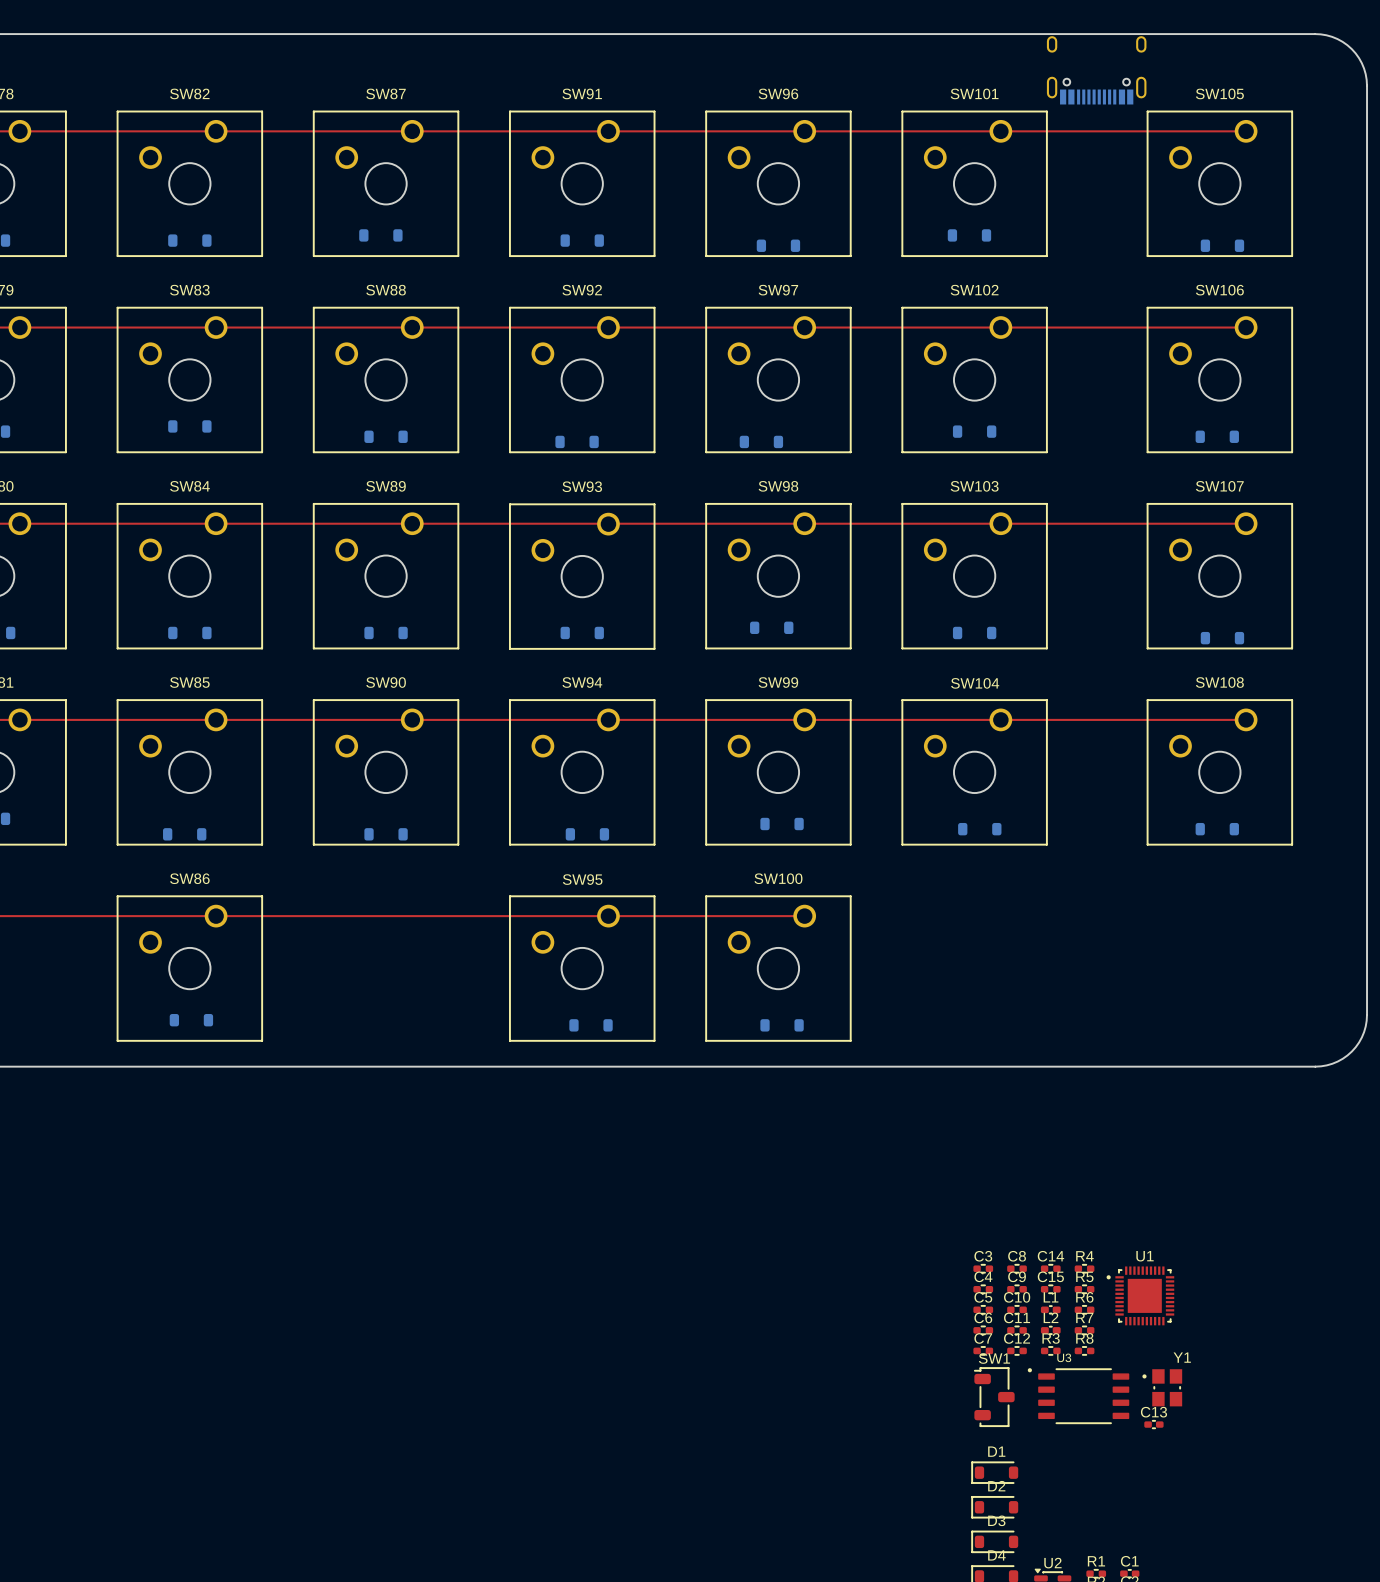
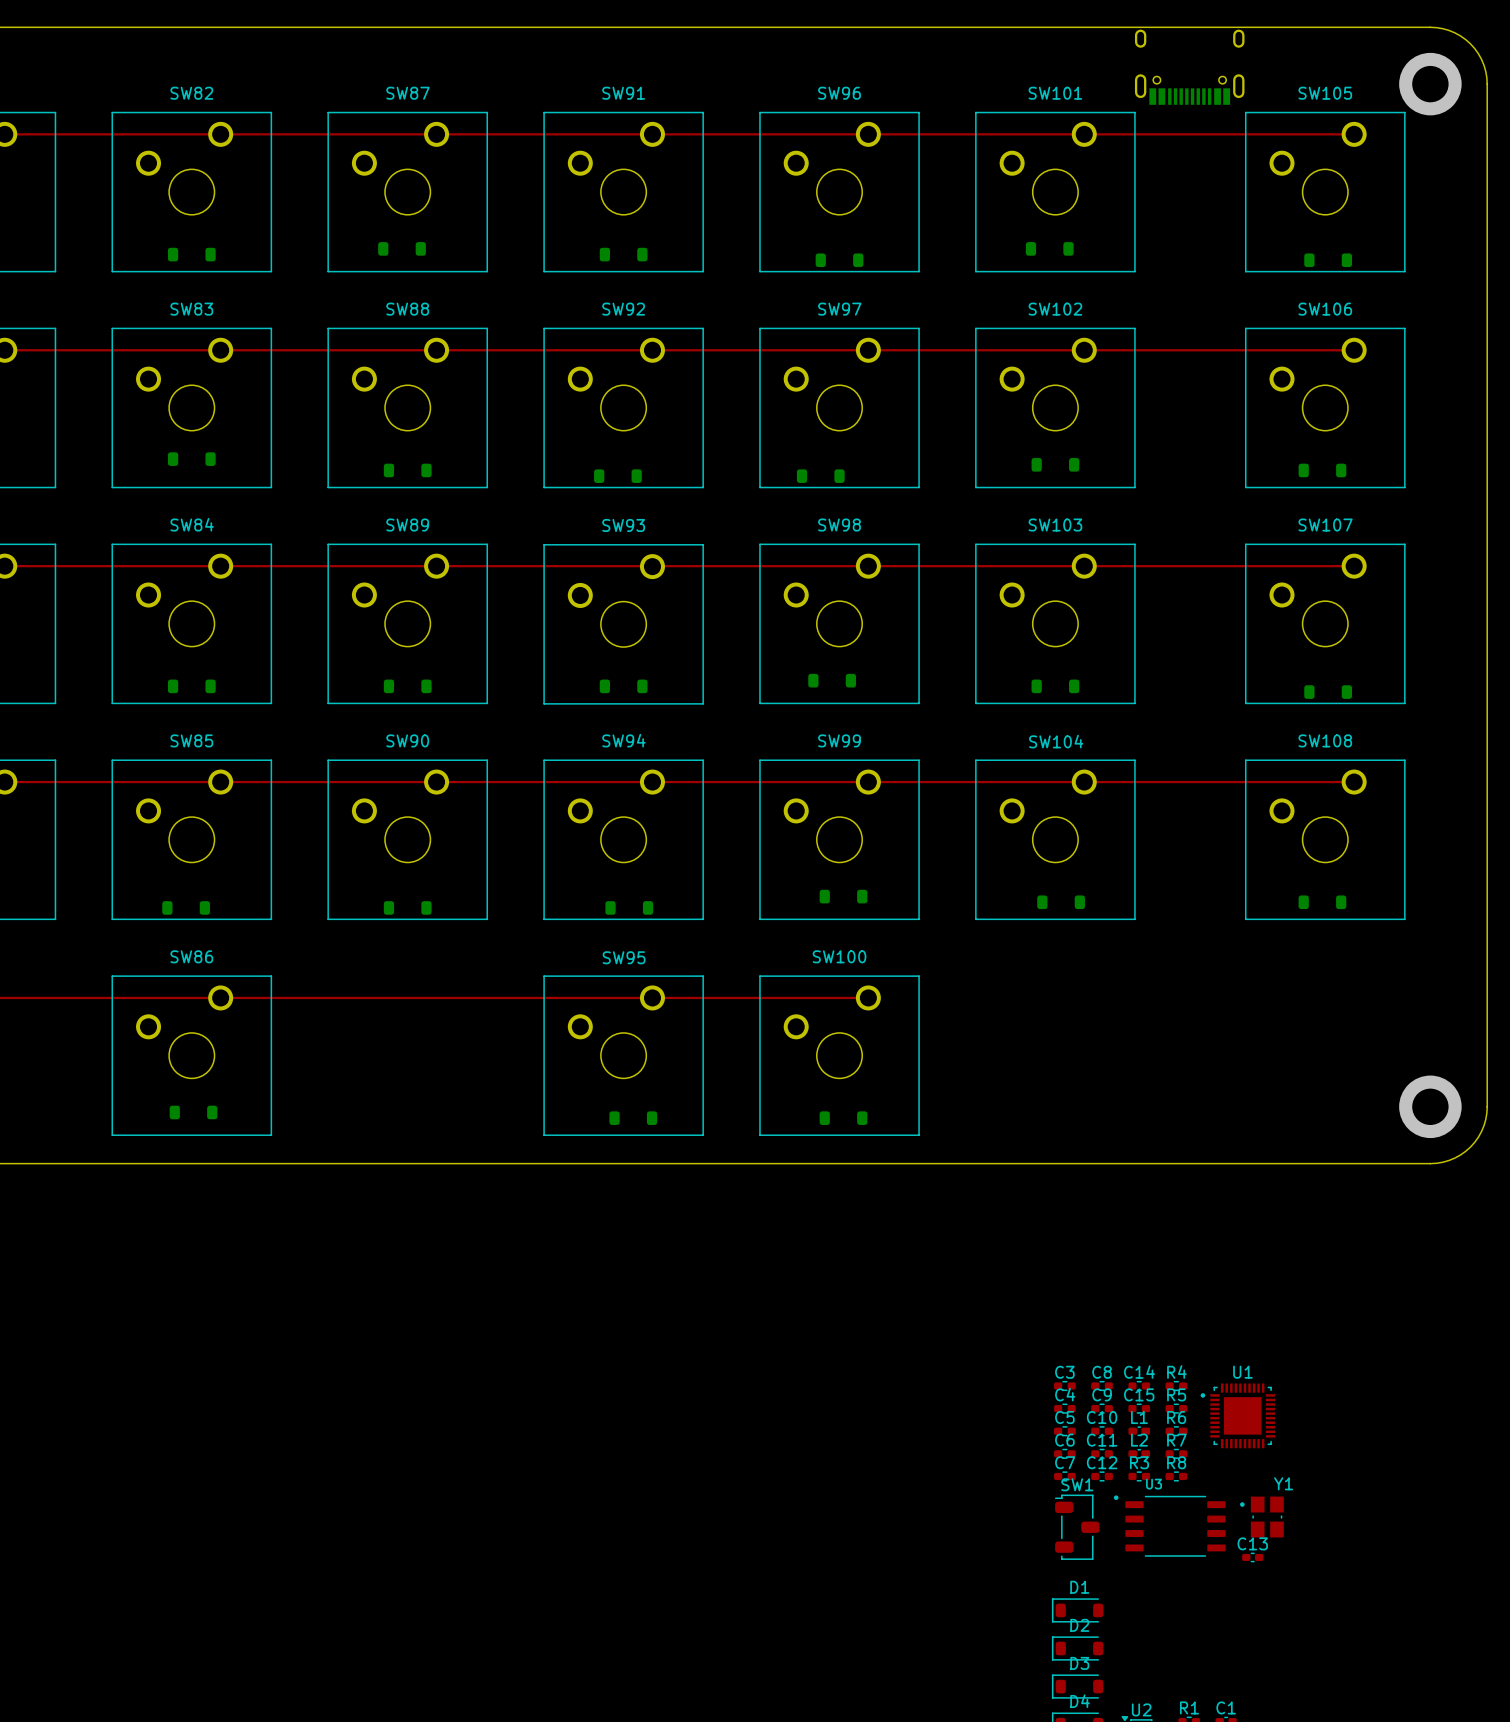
via: none -> (1430, 84)
via: none -> (1430, 1106)

